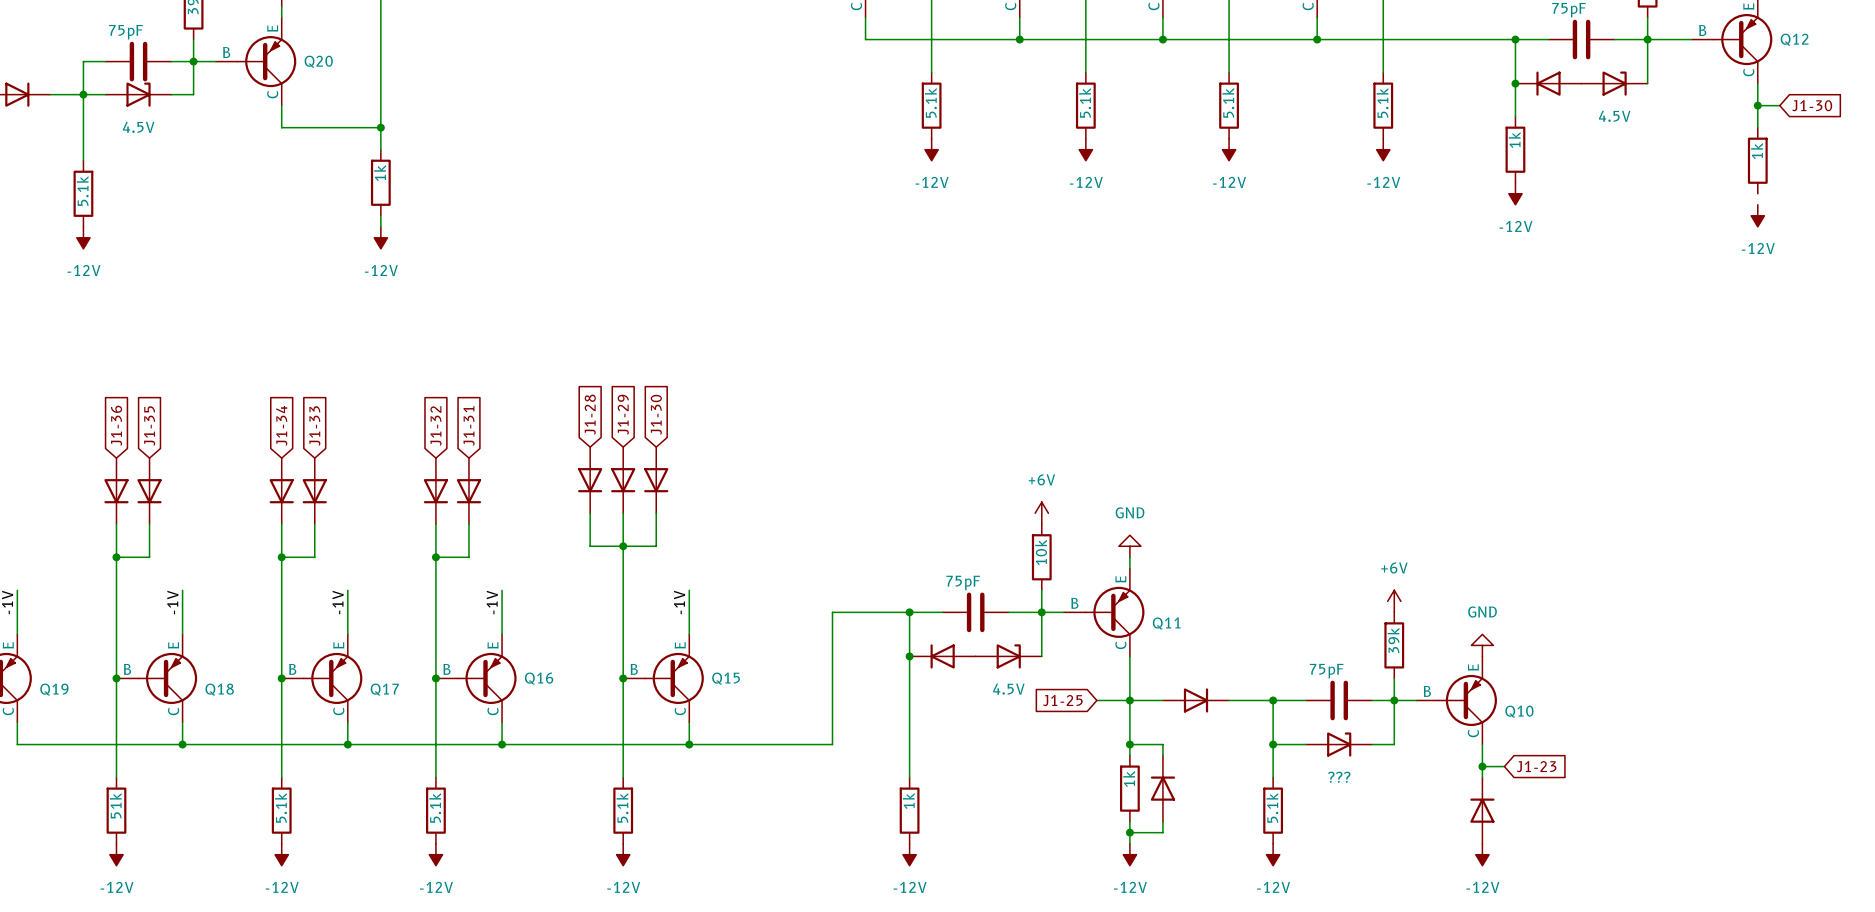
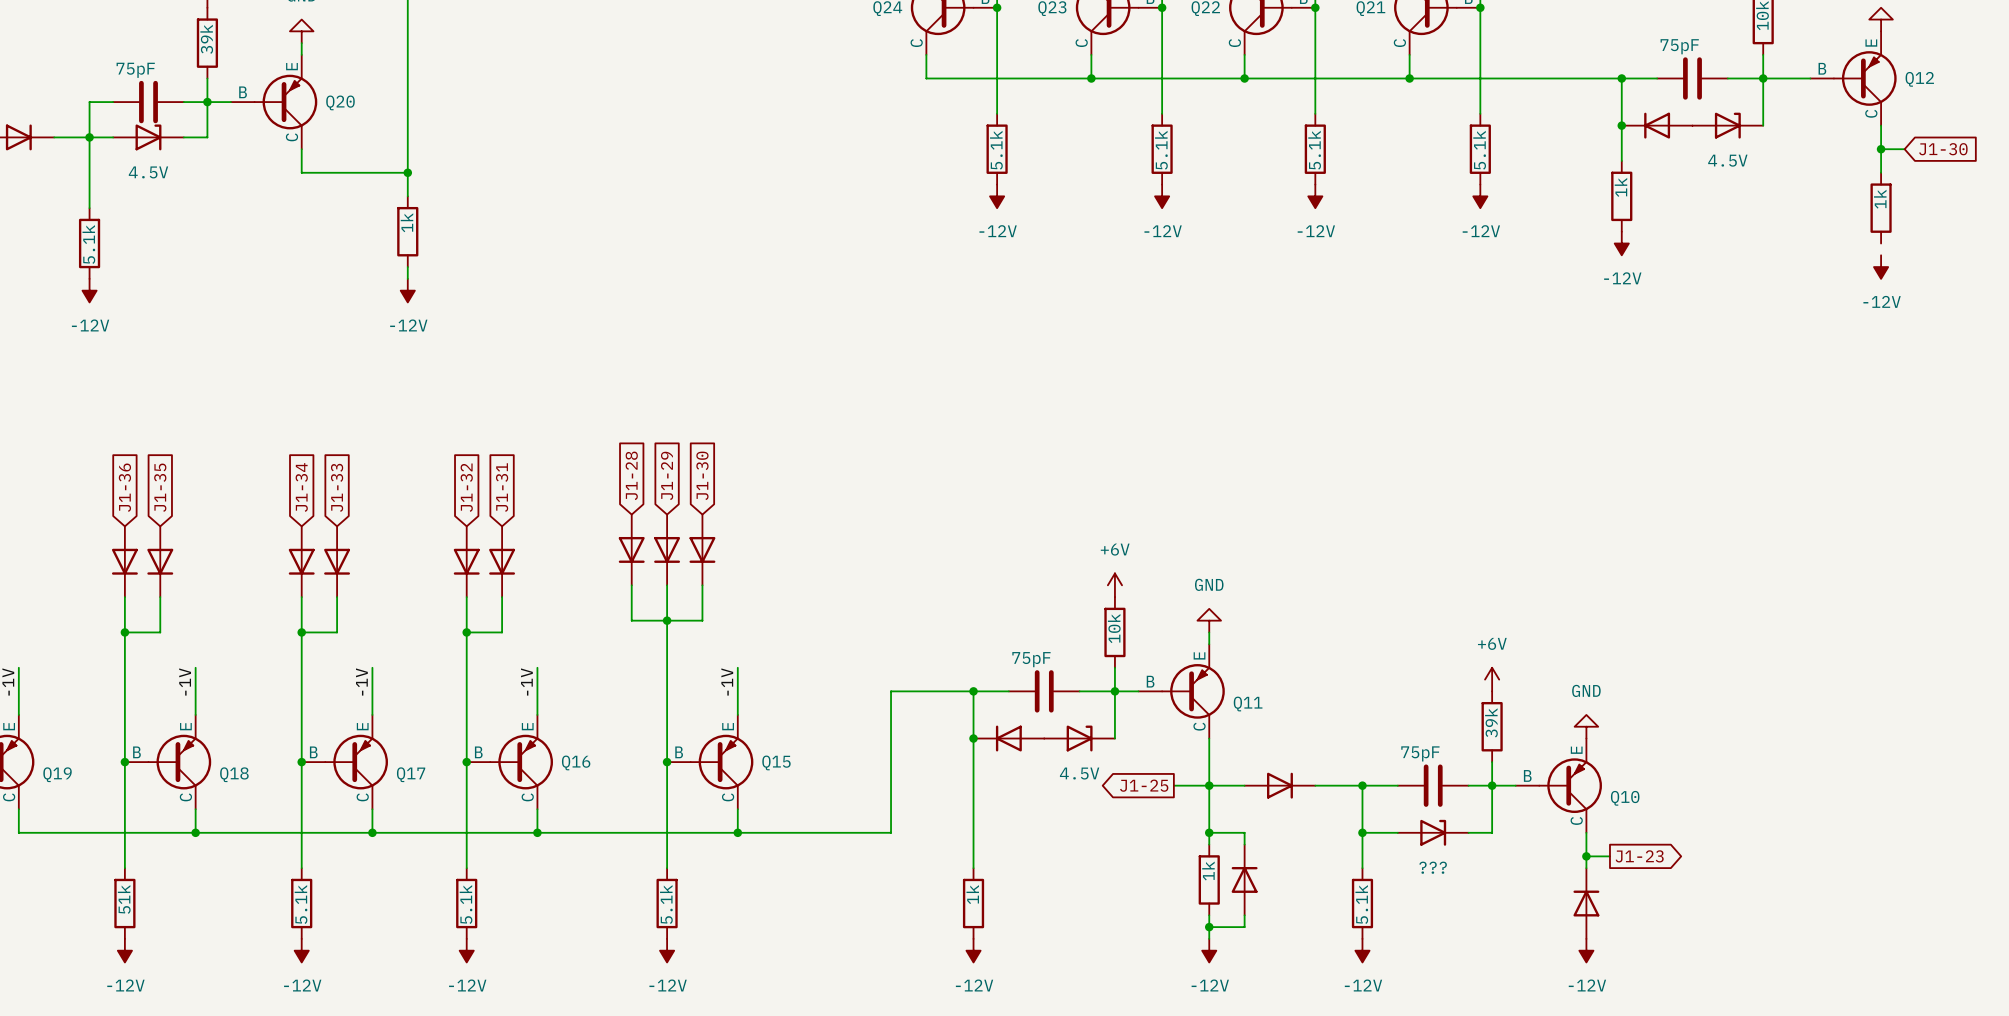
global label shape: input (1062, 700) -> output (1144, 785)
global label shape: input (1536, 766) -> output (1639, 856)

